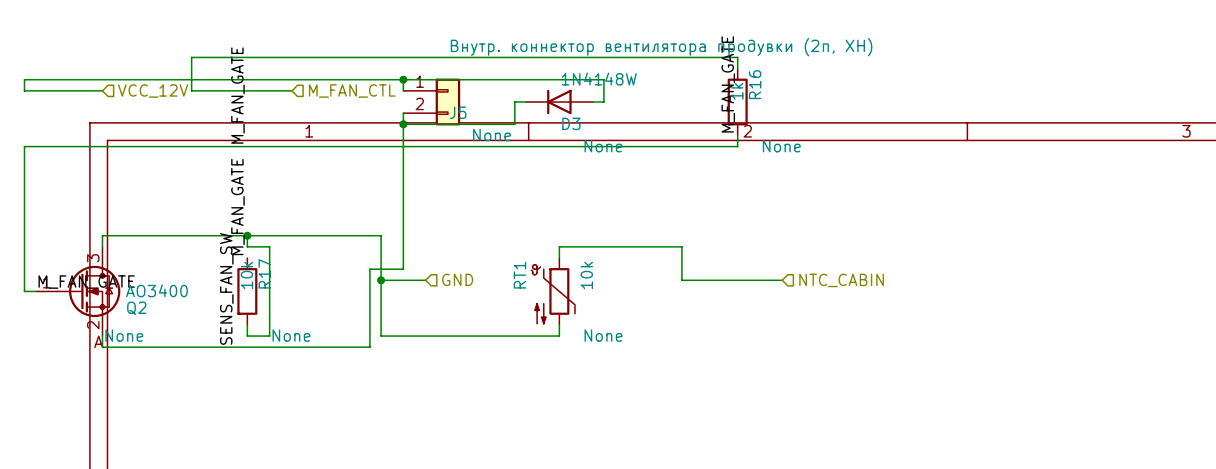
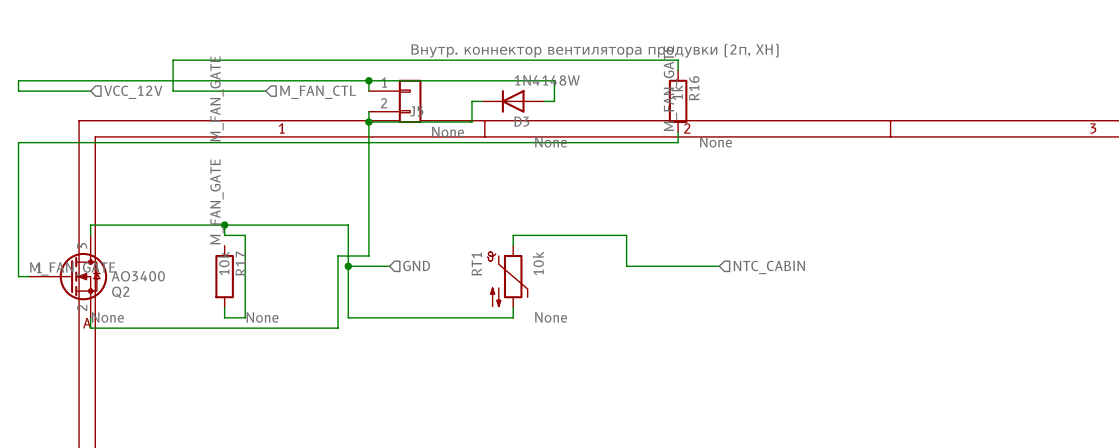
label: SENS_FAN_SW (226, 288) -> none

